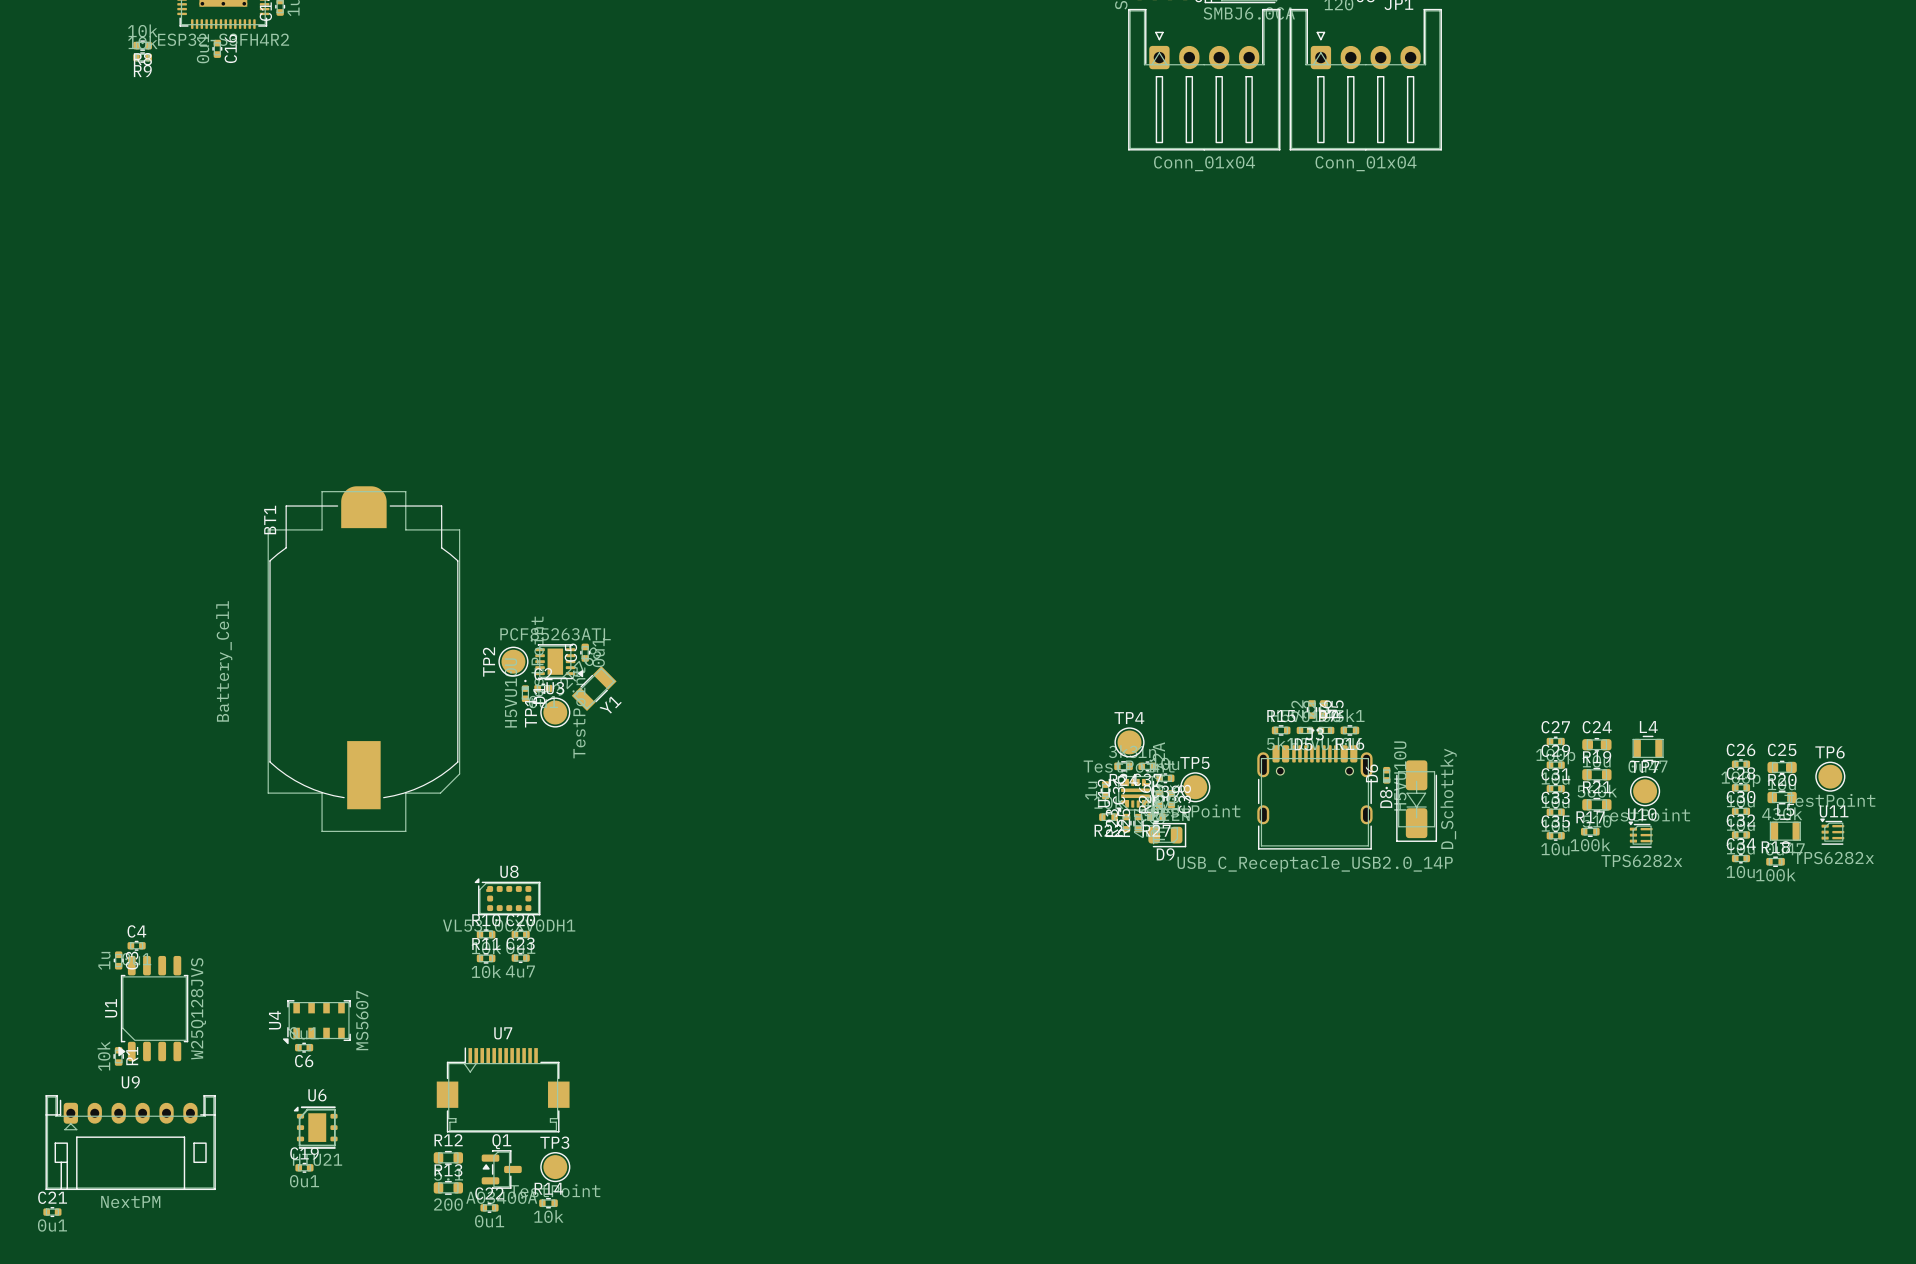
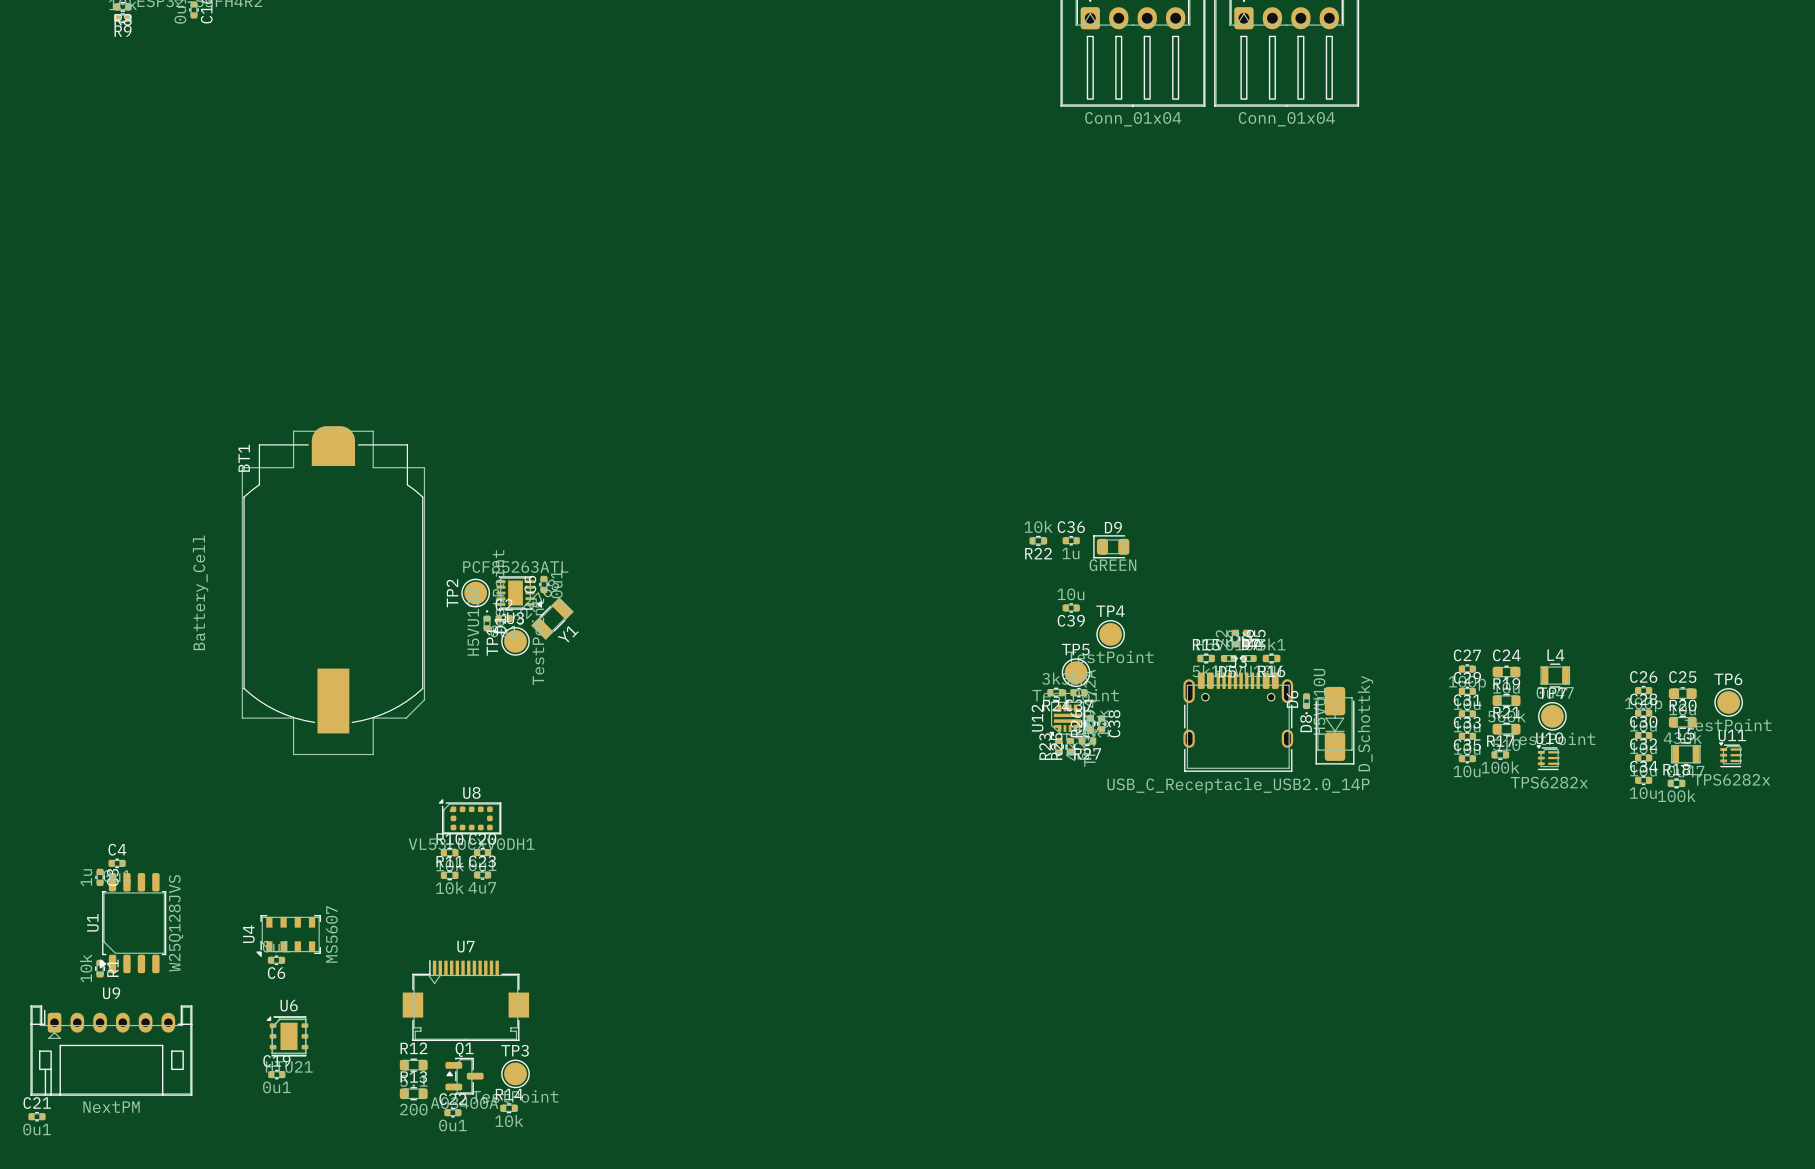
TP4 position: (1129, 742) -> (1110, 634)
C39 position: (1165, 778) -> (1071, 607)
TP5 position: (1195, 787) -> (1076, 672)
C36 rotation: 0° (1105, 790) -> 90° clockwise (1071, 540)
C36 position: (1105, 790) -> (1071, 540)
R22 position: (1108, 817) -> (1038, 540)
D9 rotation: 0° (1167, 835) -> 180° (1111, 546)
D9 position: (1167, 835) -> (1111, 546)

